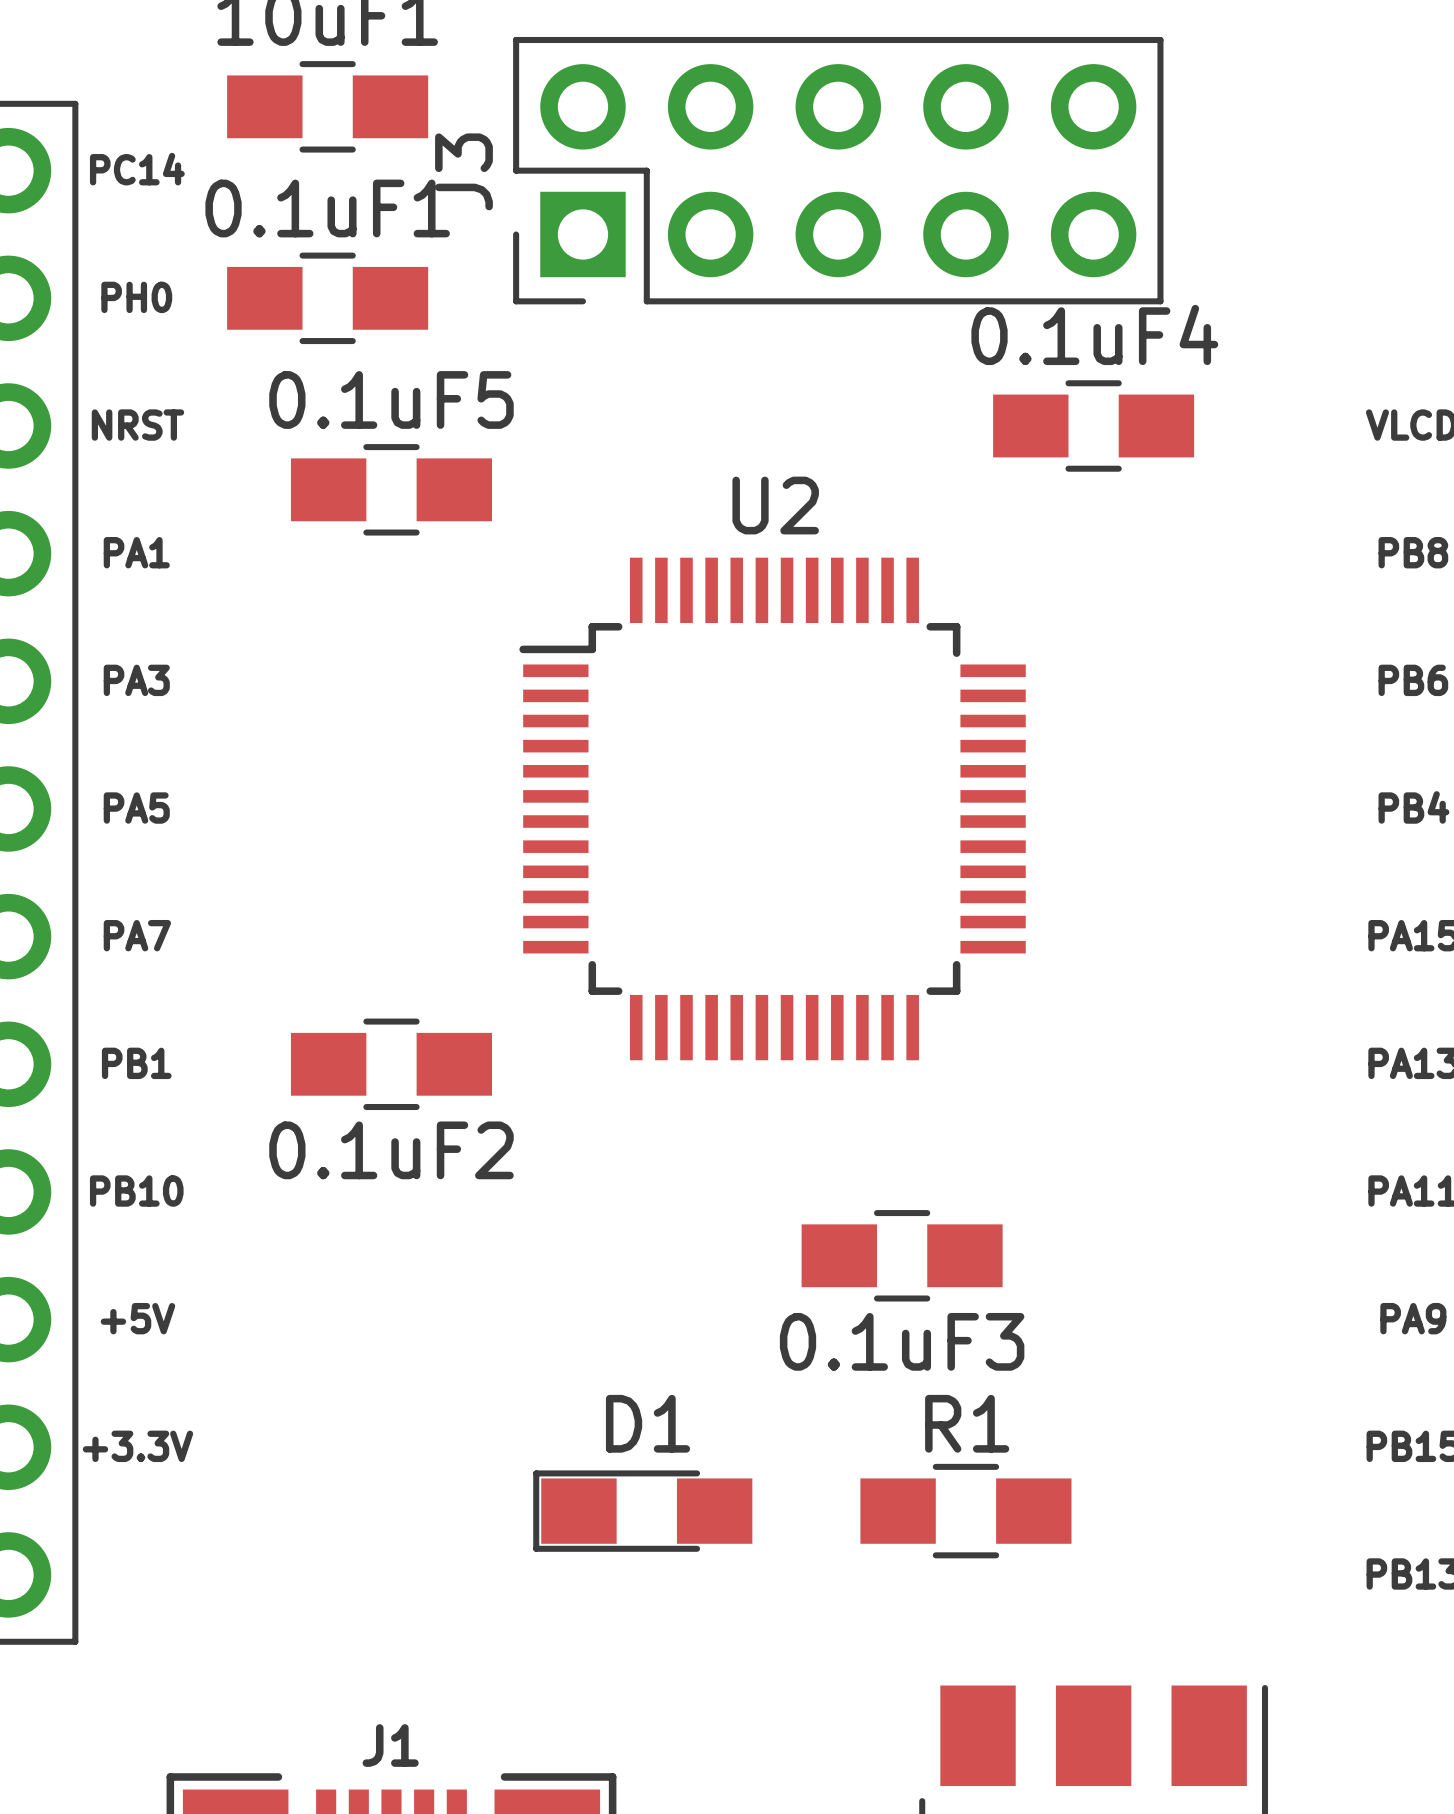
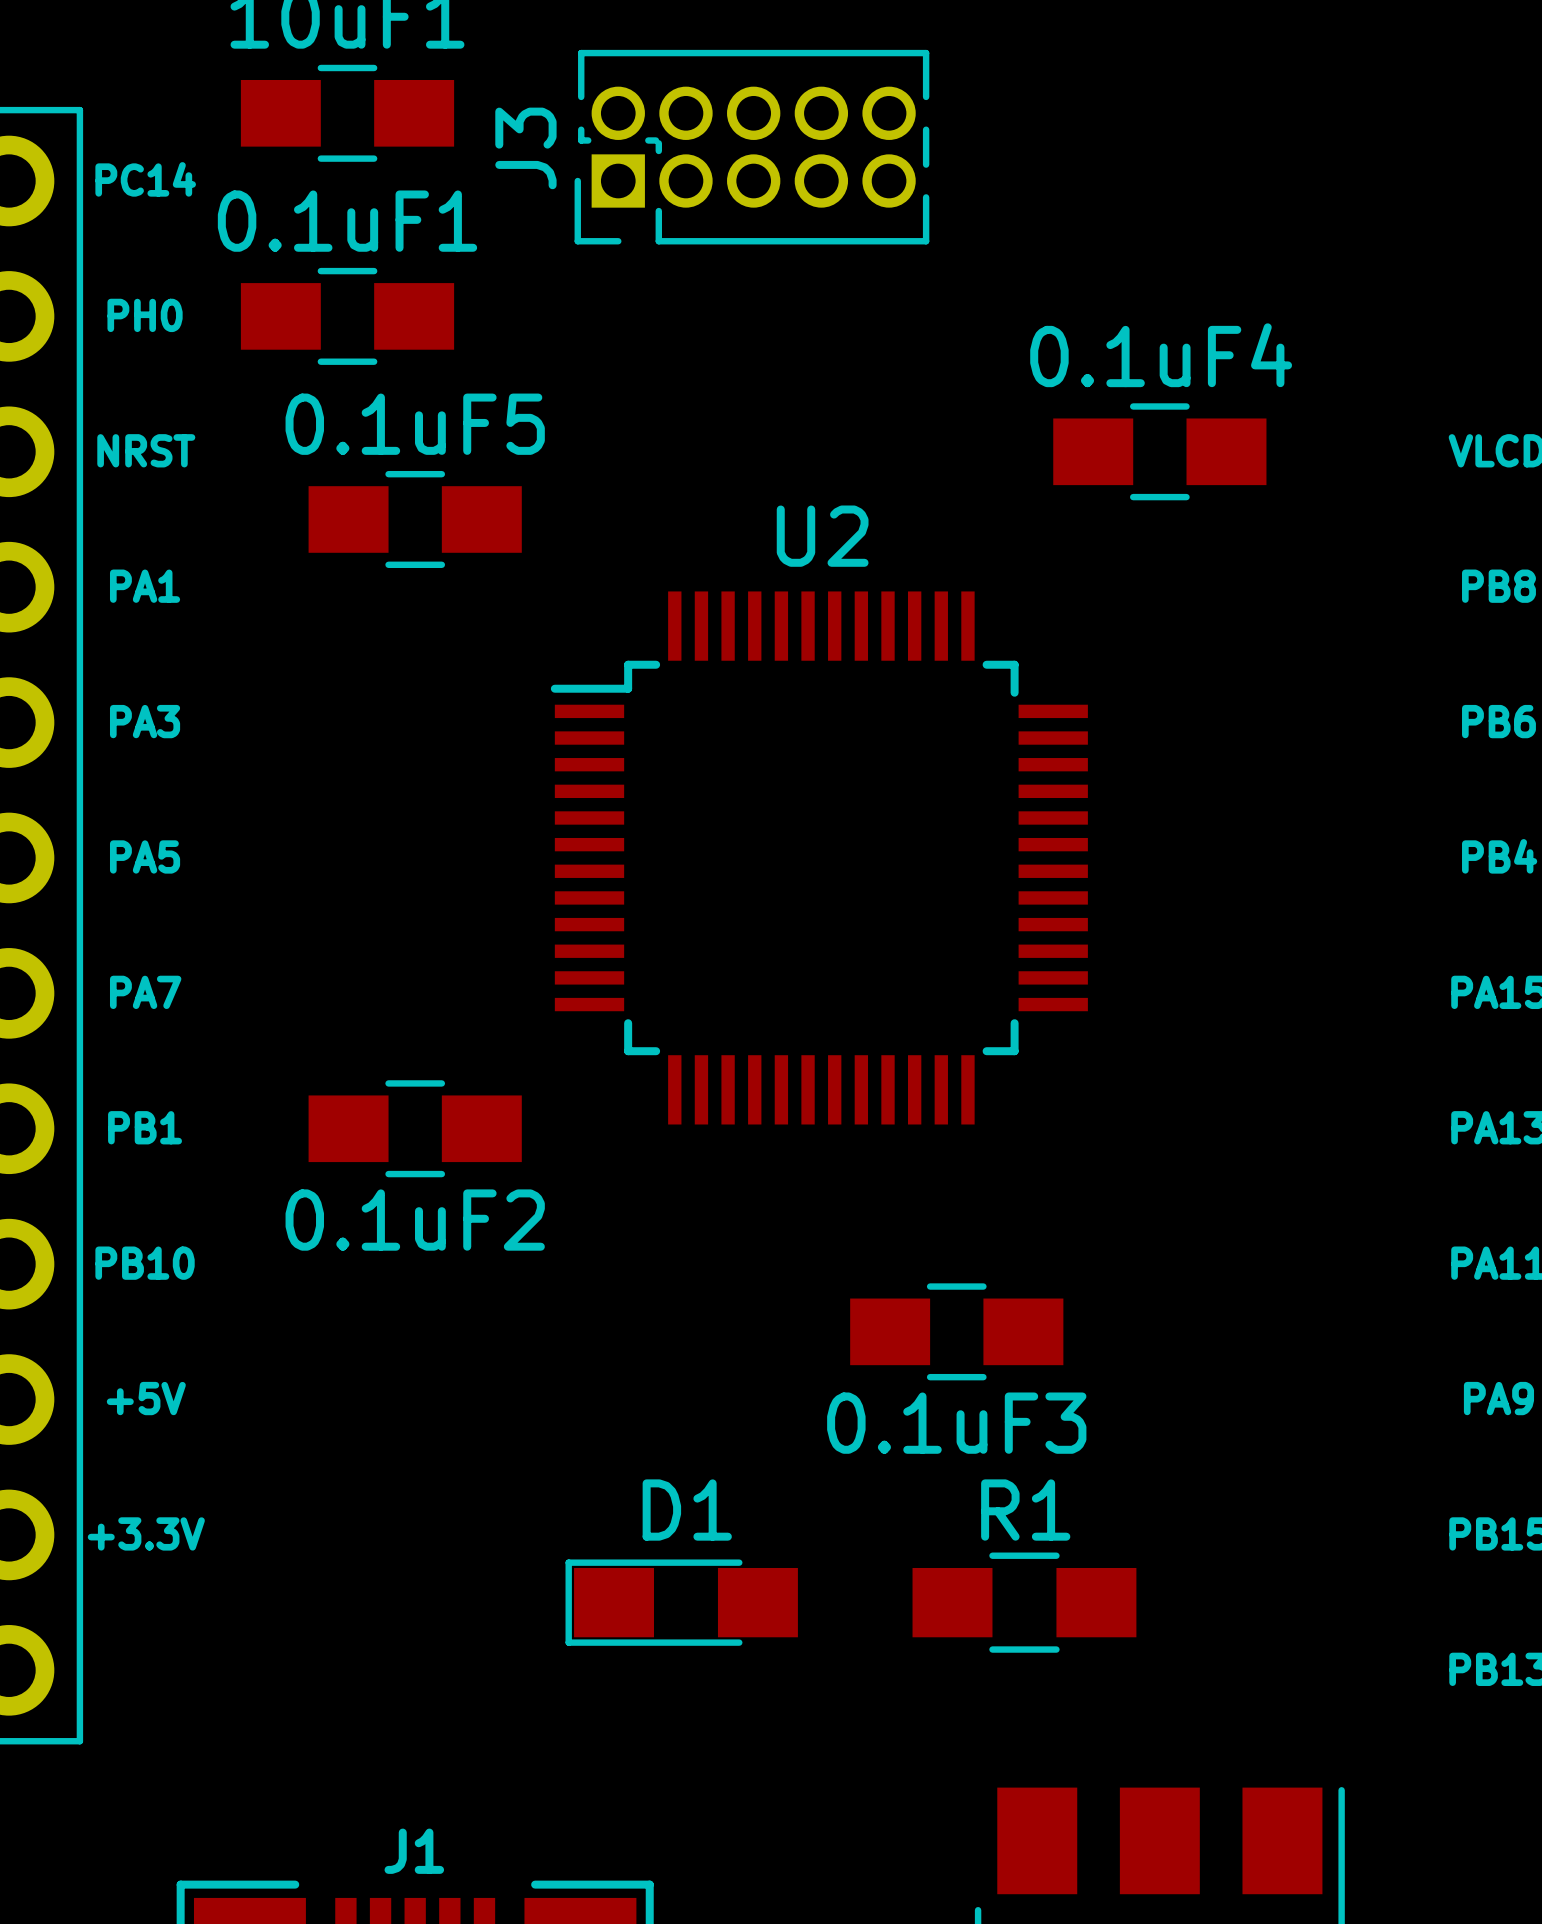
J3 footprint: [513, 36, 1164, 305] -> [574, 49, 930, 245]
J3 name position: J3 (463, 171) -> J3 (525, 148)

